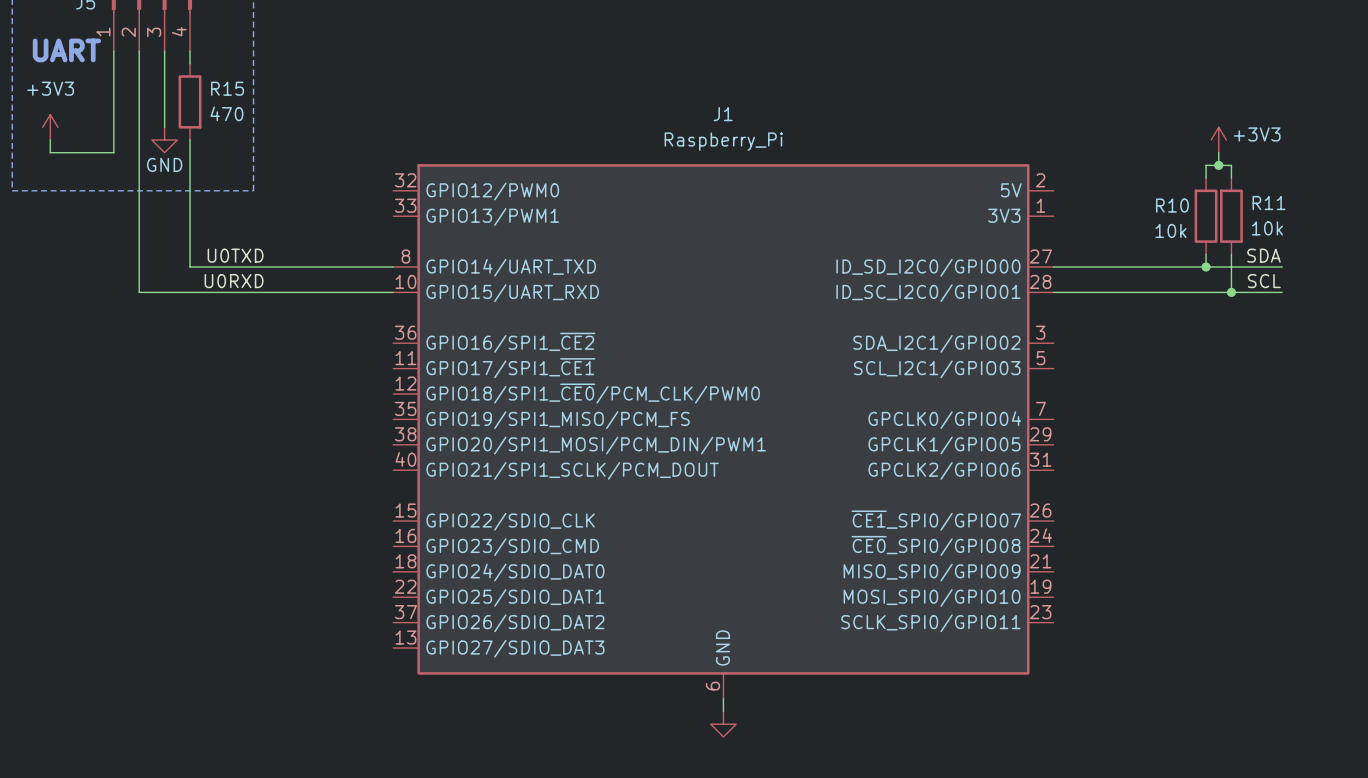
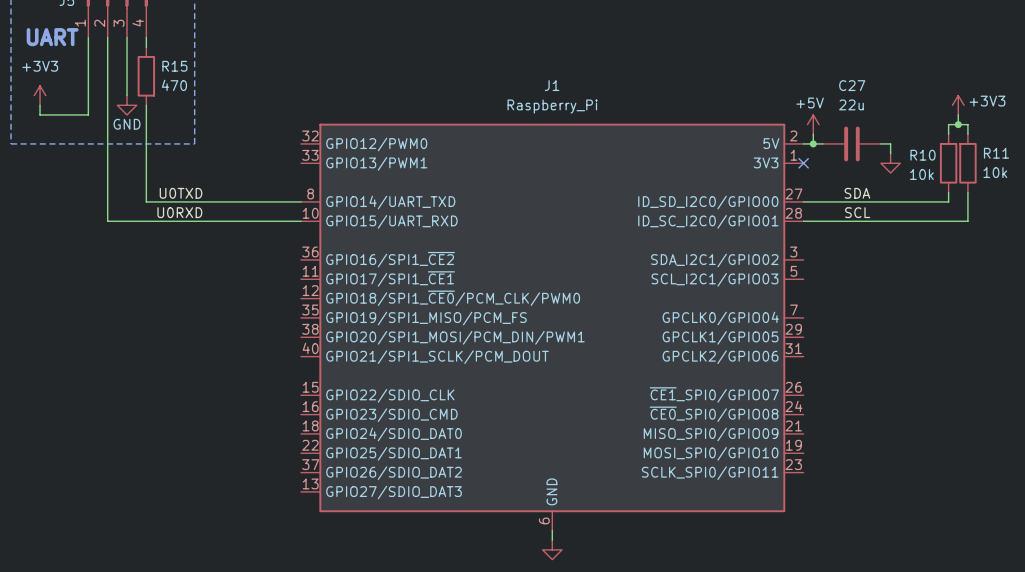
power symbol position: +3V3 (1218, 140) -> +3V3 (958, 105)
wire: (1218, 152) (1218, 165) -> (958, 114) (958, 124)
power symbol: none -> +5V (813, 124)
junction position: (1218, 165) -> (958, 124)
wire: (1206, 178) (1206, 165) (1231, 165) (1231, 178) -> (948, 134) (948, 124) (967, 124) (967, 134)
wire: none -> (803, 143) (822, 143)
junction: none -> (813, 143)
C27: none -> 22u (851, 143)
wire: none -> (880, 143) (890, 143) (890, 153)
no-connect mark: none -> (803, 163)
power symbol: none -> (890, 163)
R10 position: (1206, 216) -> (948, 163)
R11 position: (1231, 216) -> (967, 163)
wire: (1206, 254) (1206, 267) -> (813, 134) (813, 143)
wire: (1231, 254) (1231, 292) -> none
label position: SDA (1264, 255) -> SDA (857, 193)
junction: (1206, 267) -> none
wire: (1244, 267) (1282, 267) -> (948, 201) (948, 192)
label position: SCL (1264, 281) -> SCL (857, 212)
junction: (1231, 292) -> none
wire: (1269, 292) (1282, 292) -> (967, 221) (967, 192)

